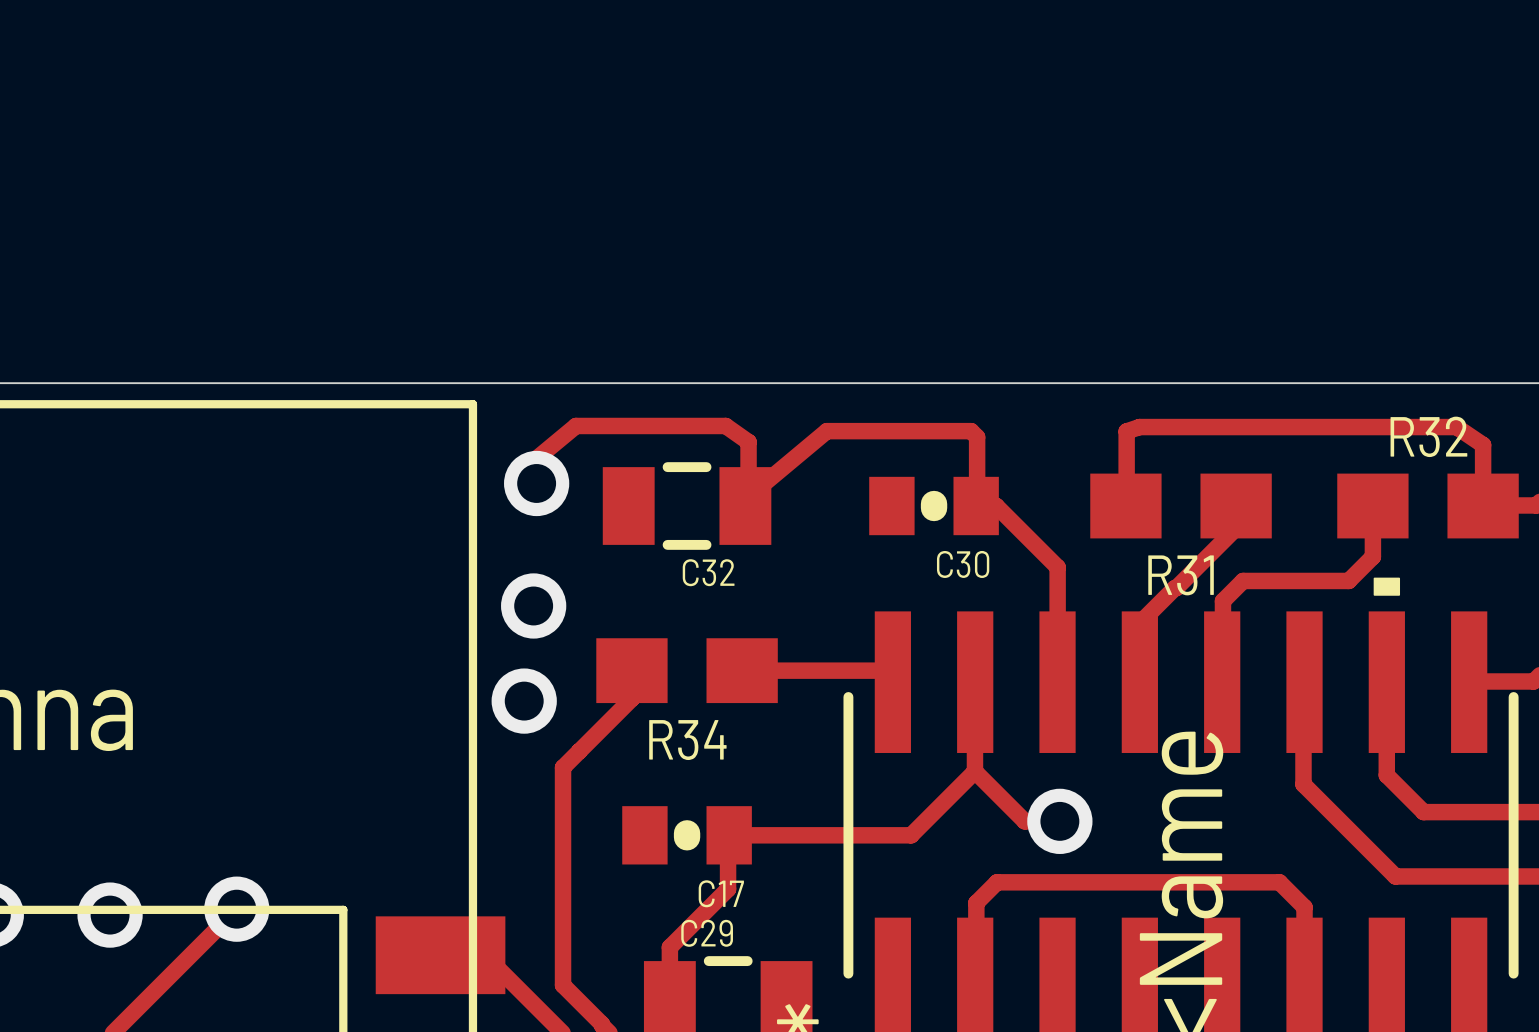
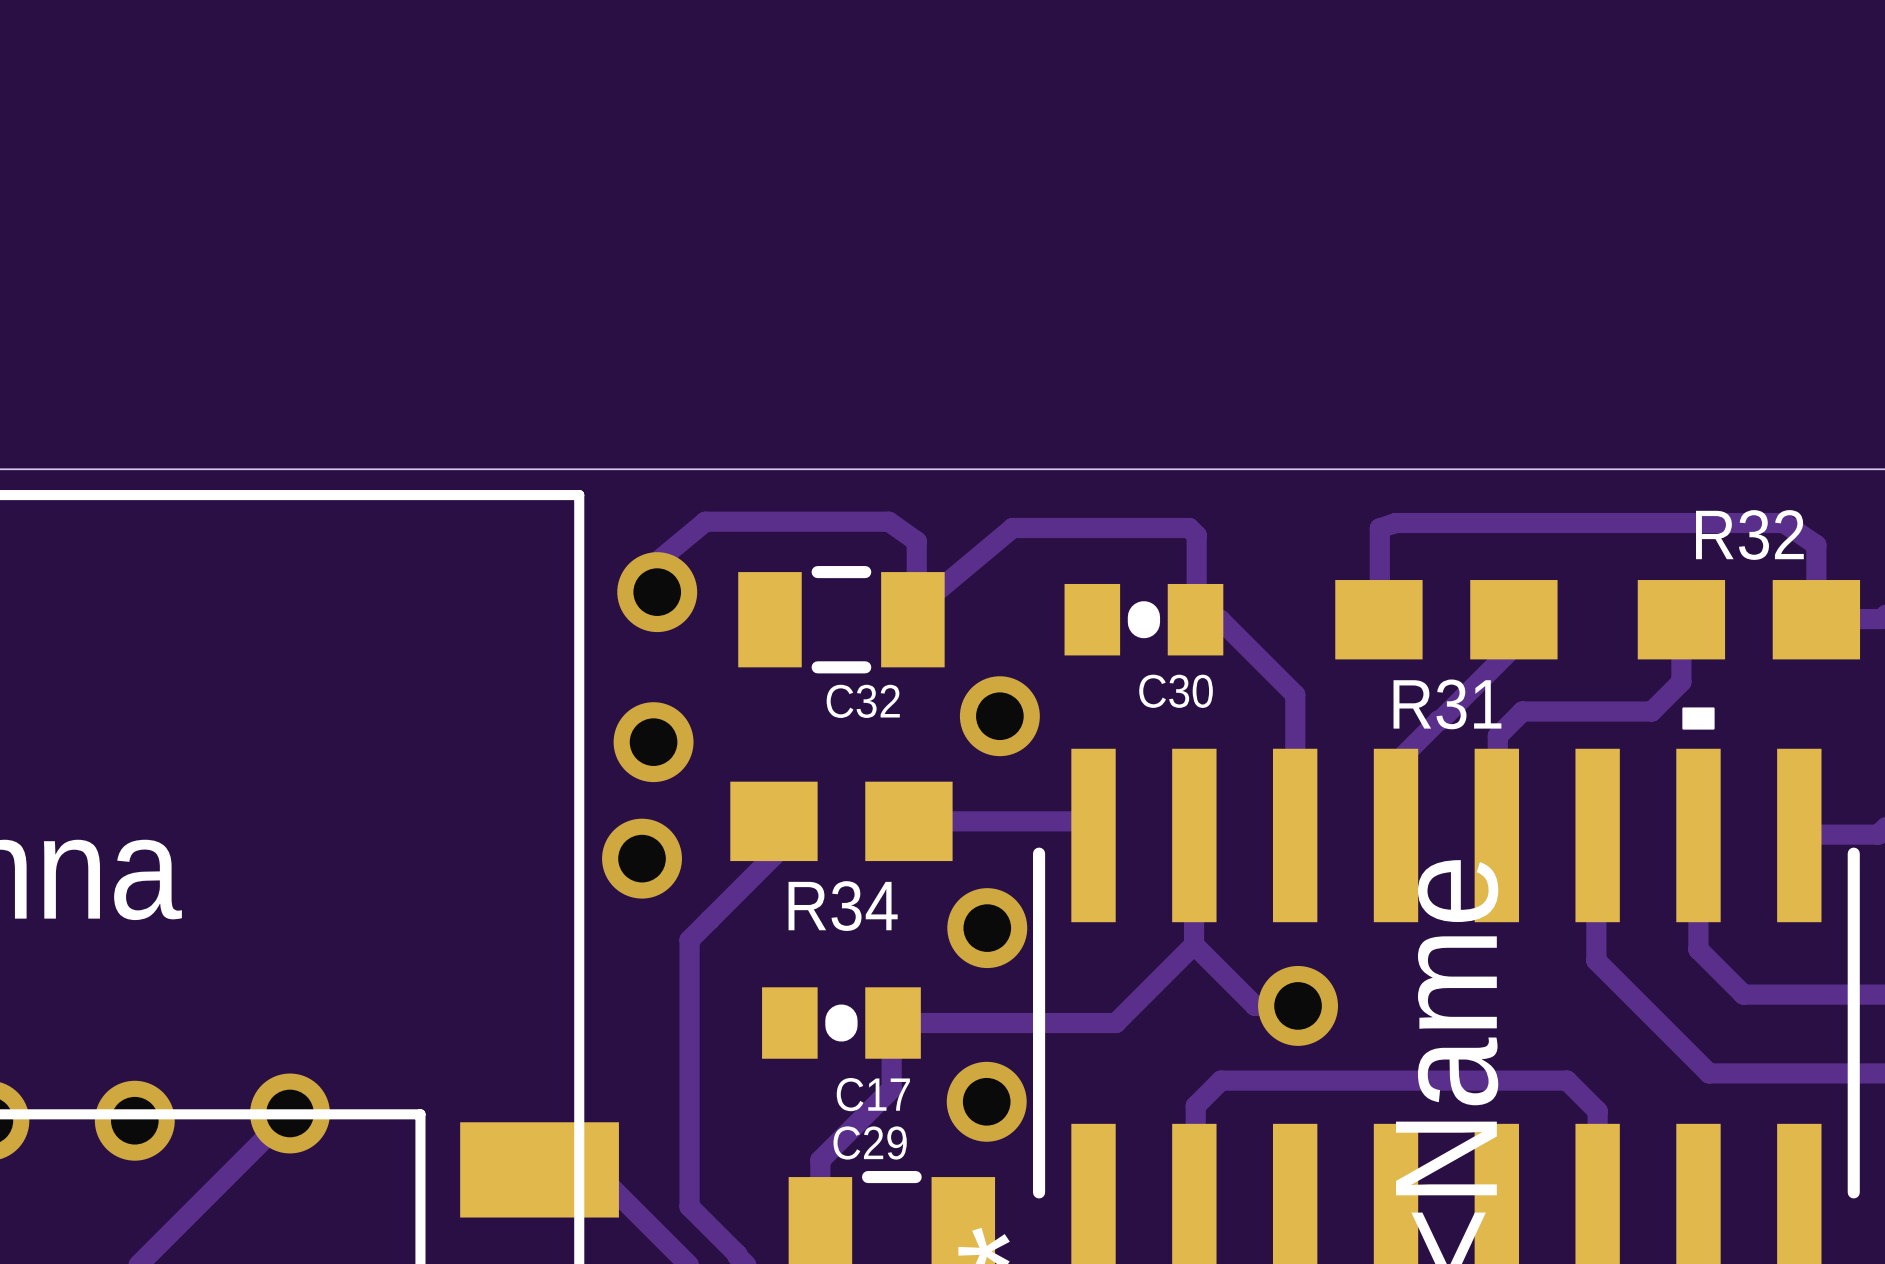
via: none -> (999, 716)
via: none -> (987, 928)
via: none -> (986, 1101)

